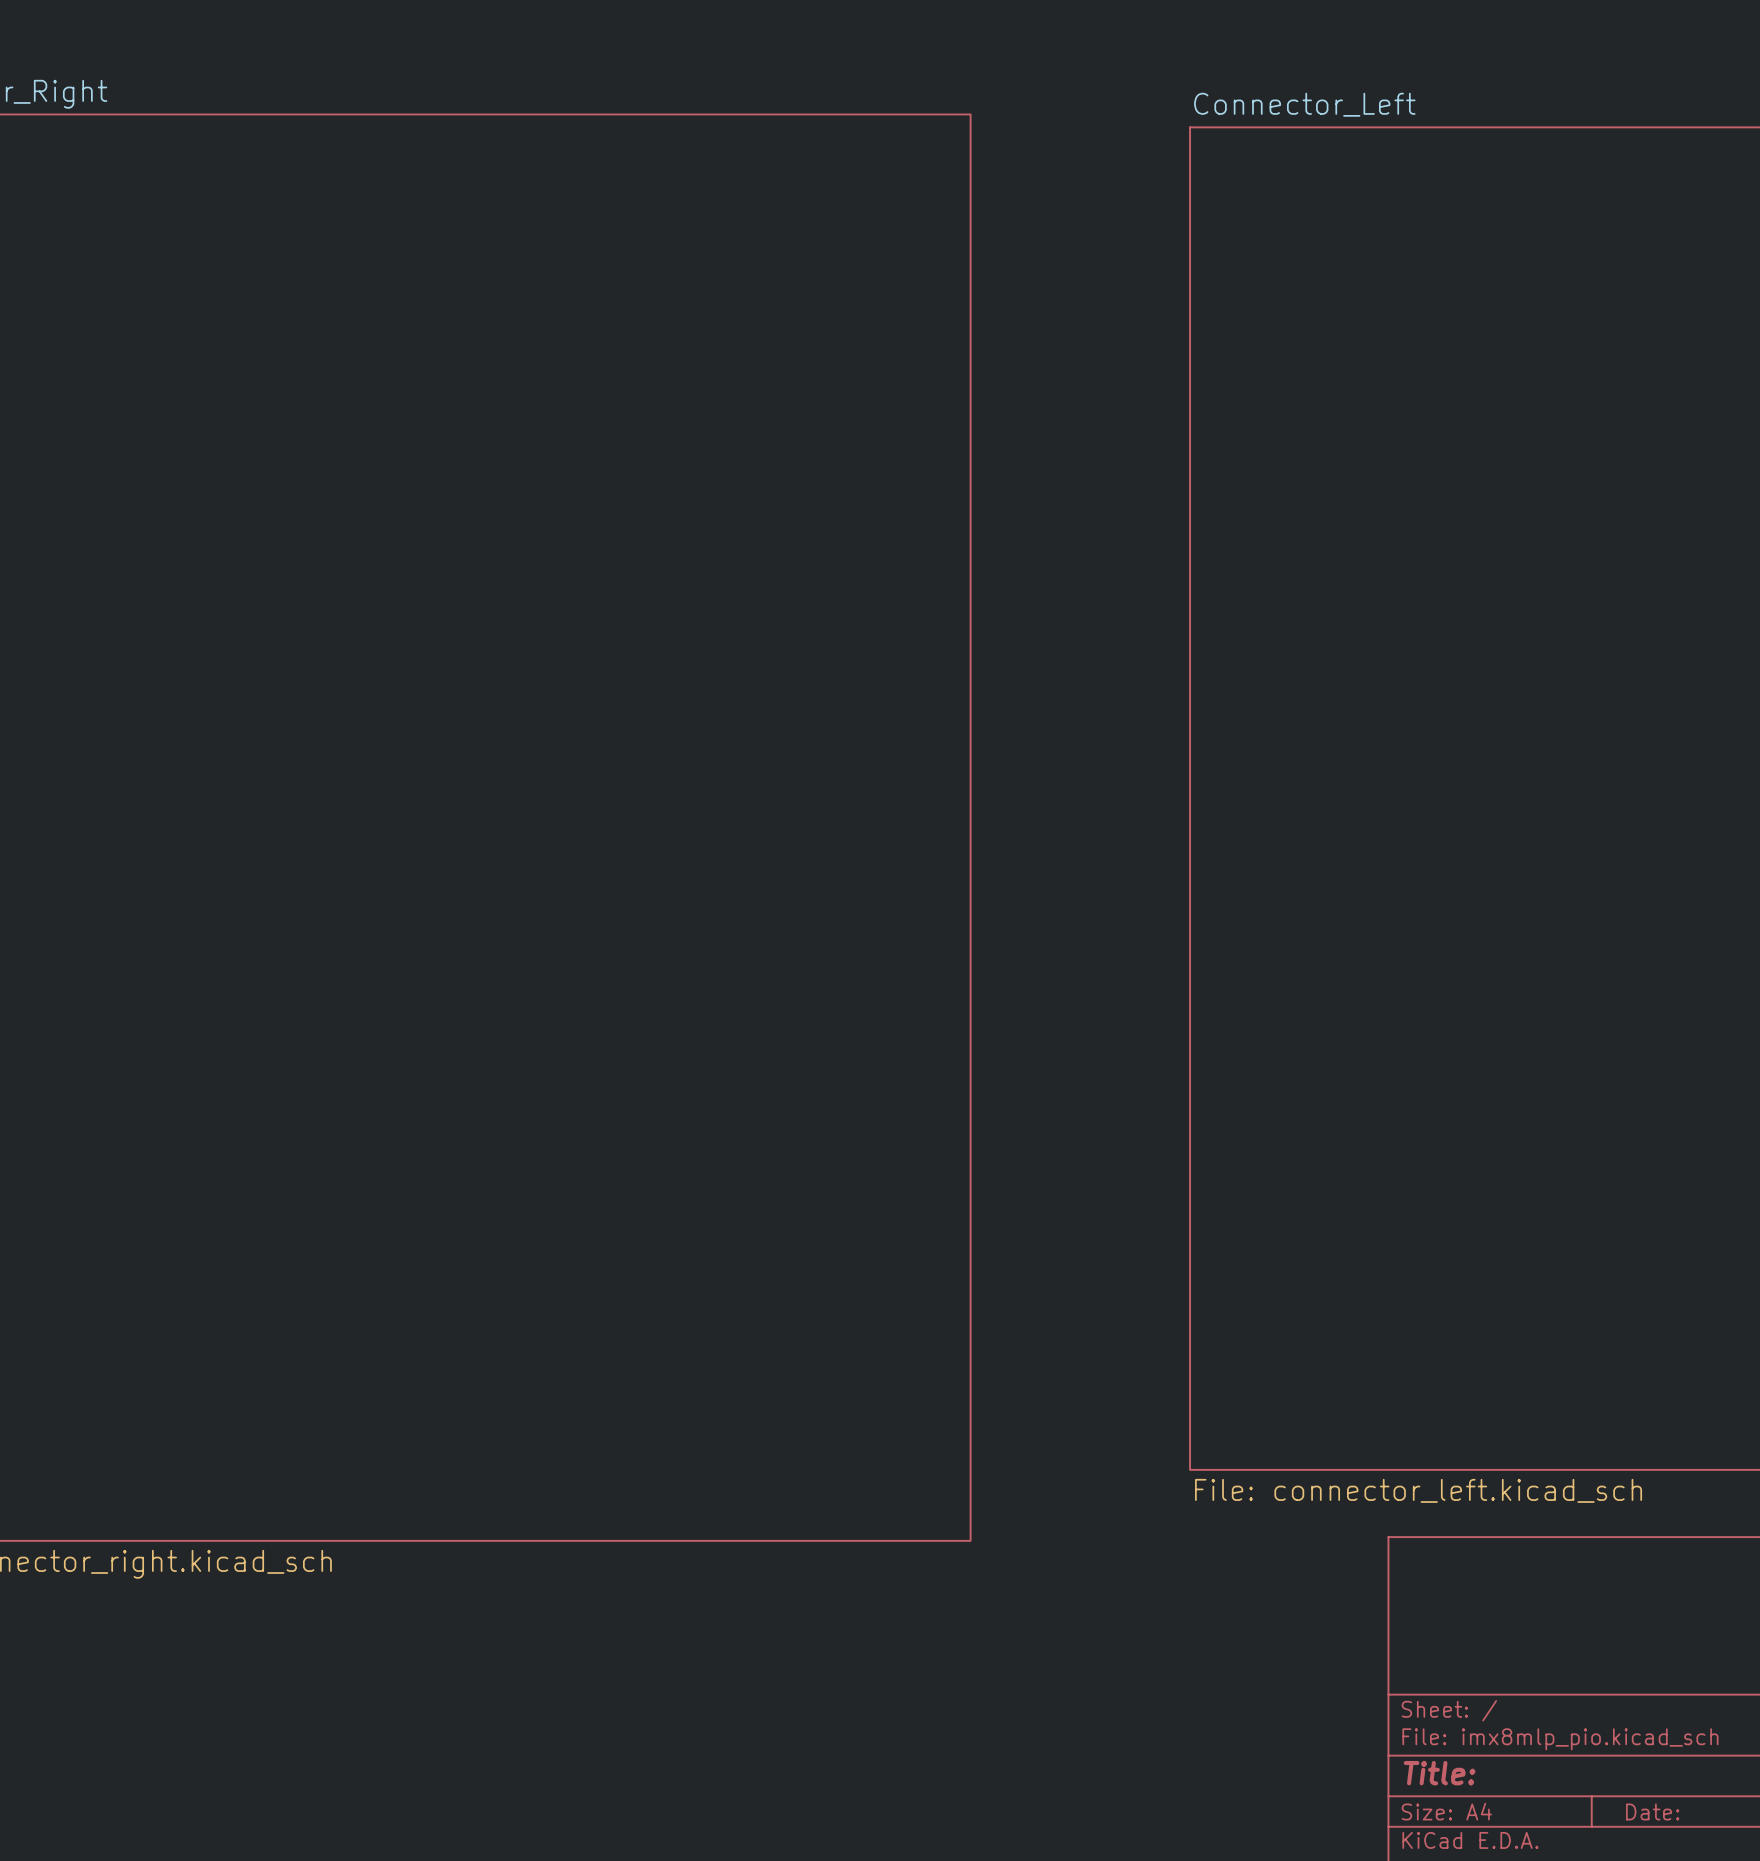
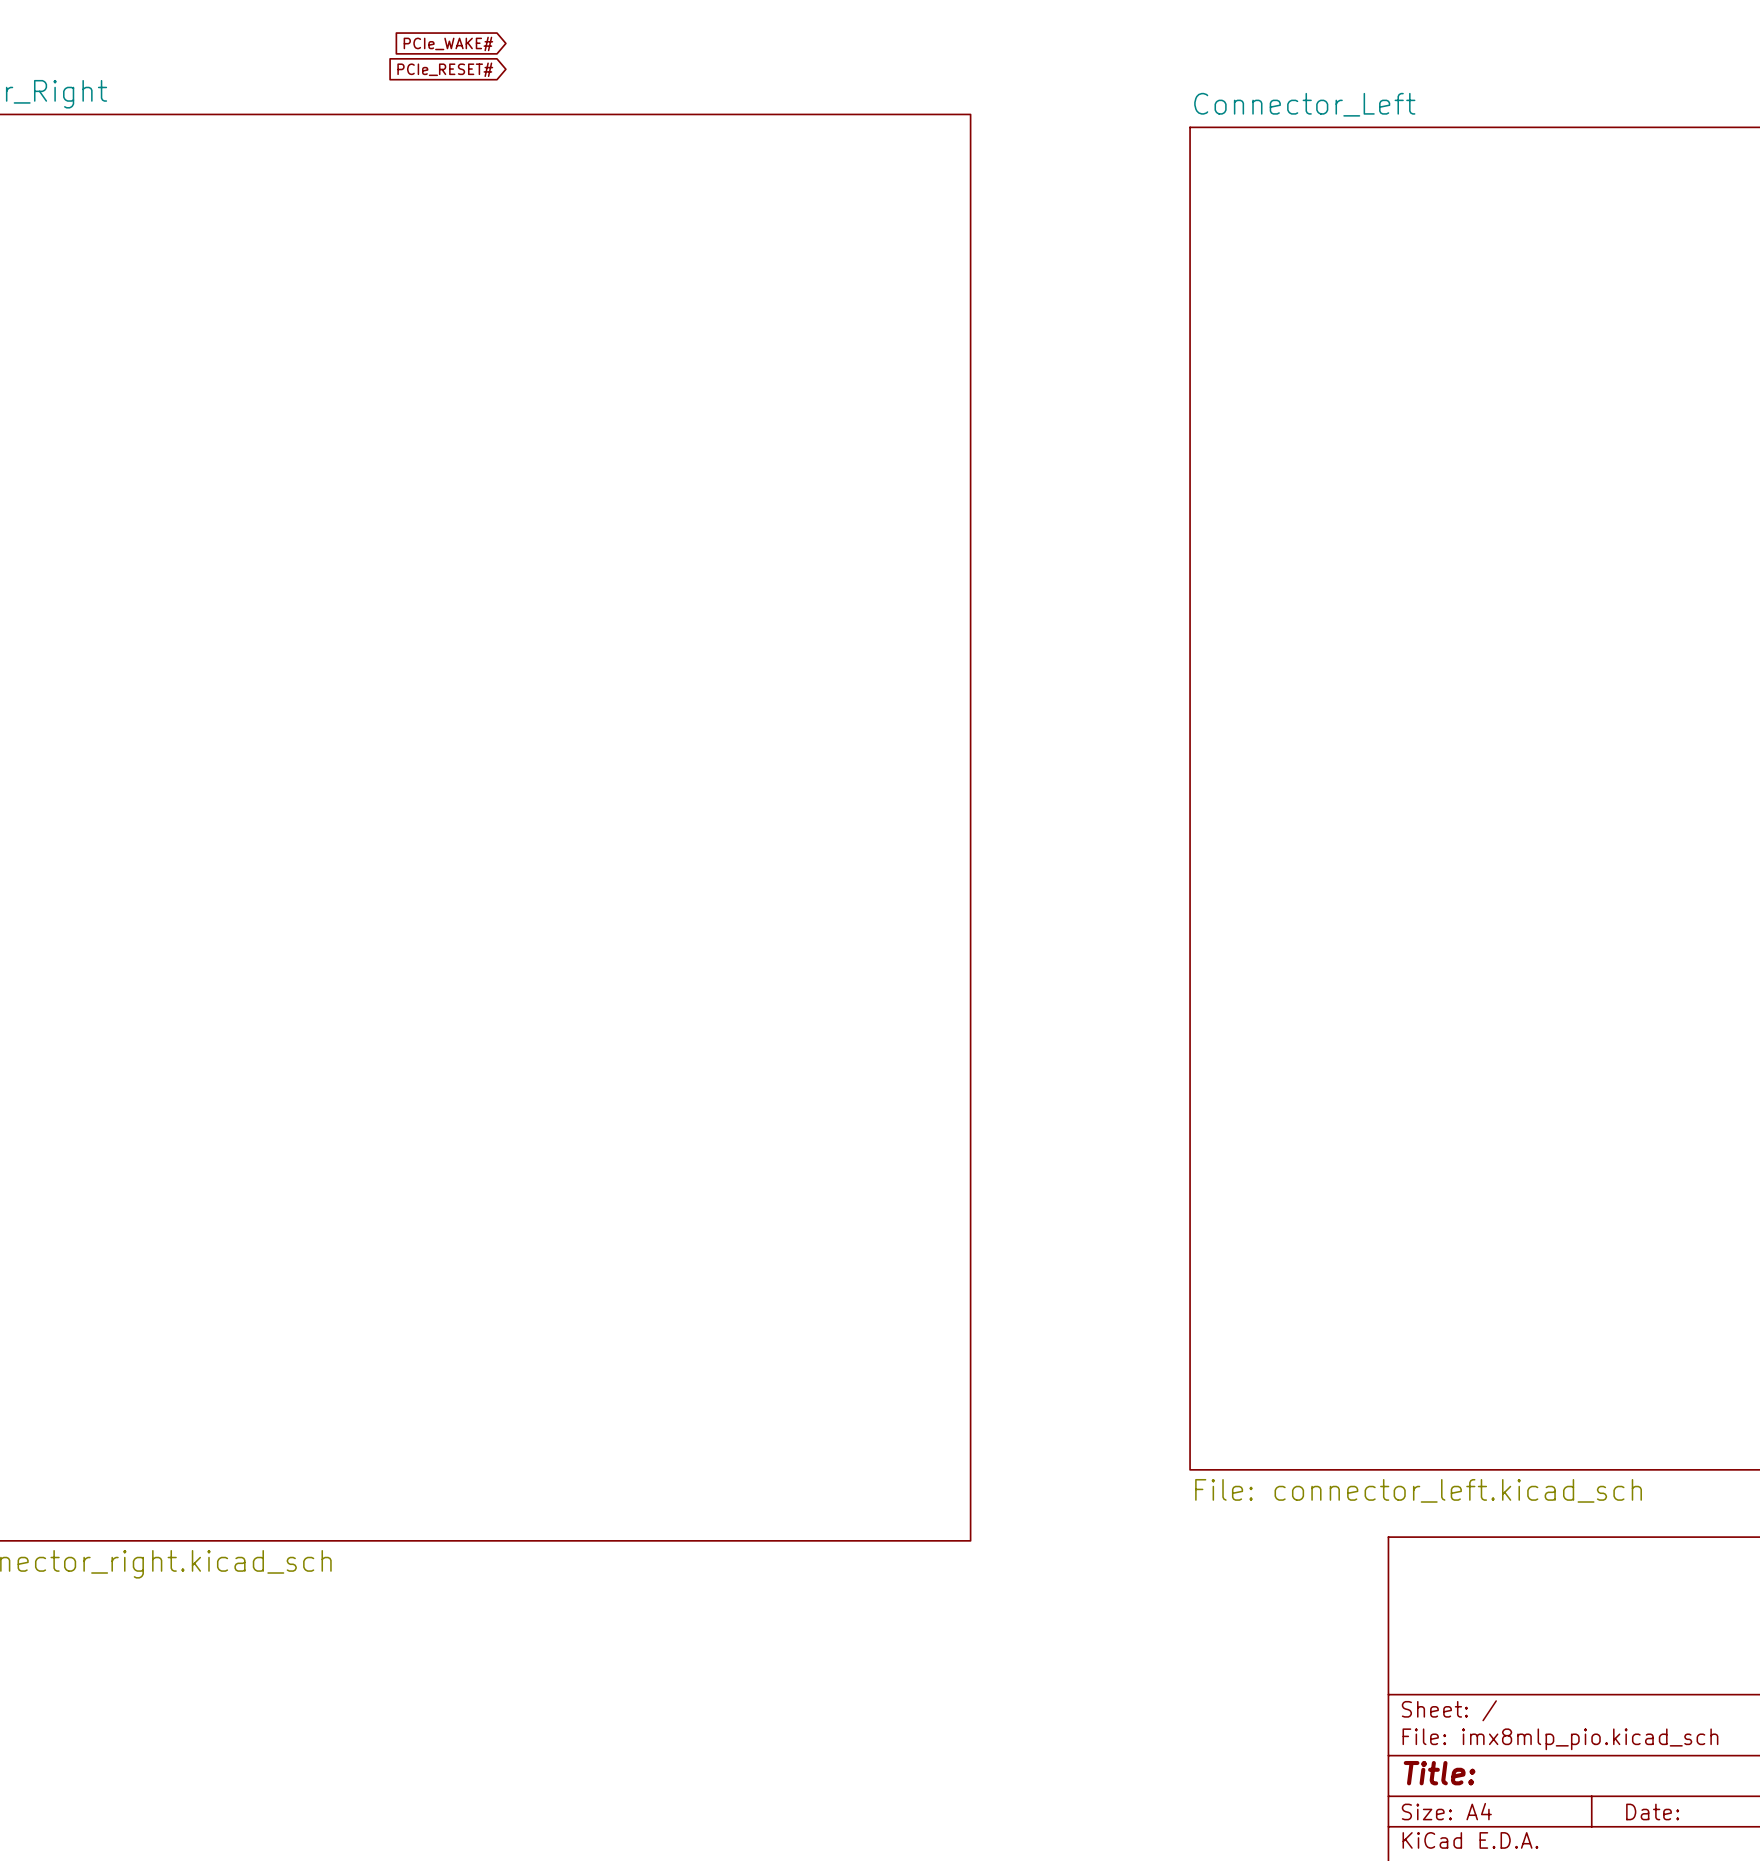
global label: none -> PCIe_WAKE# (448, 43)
global label: none -> PCIe_RESET# (445, 69)

